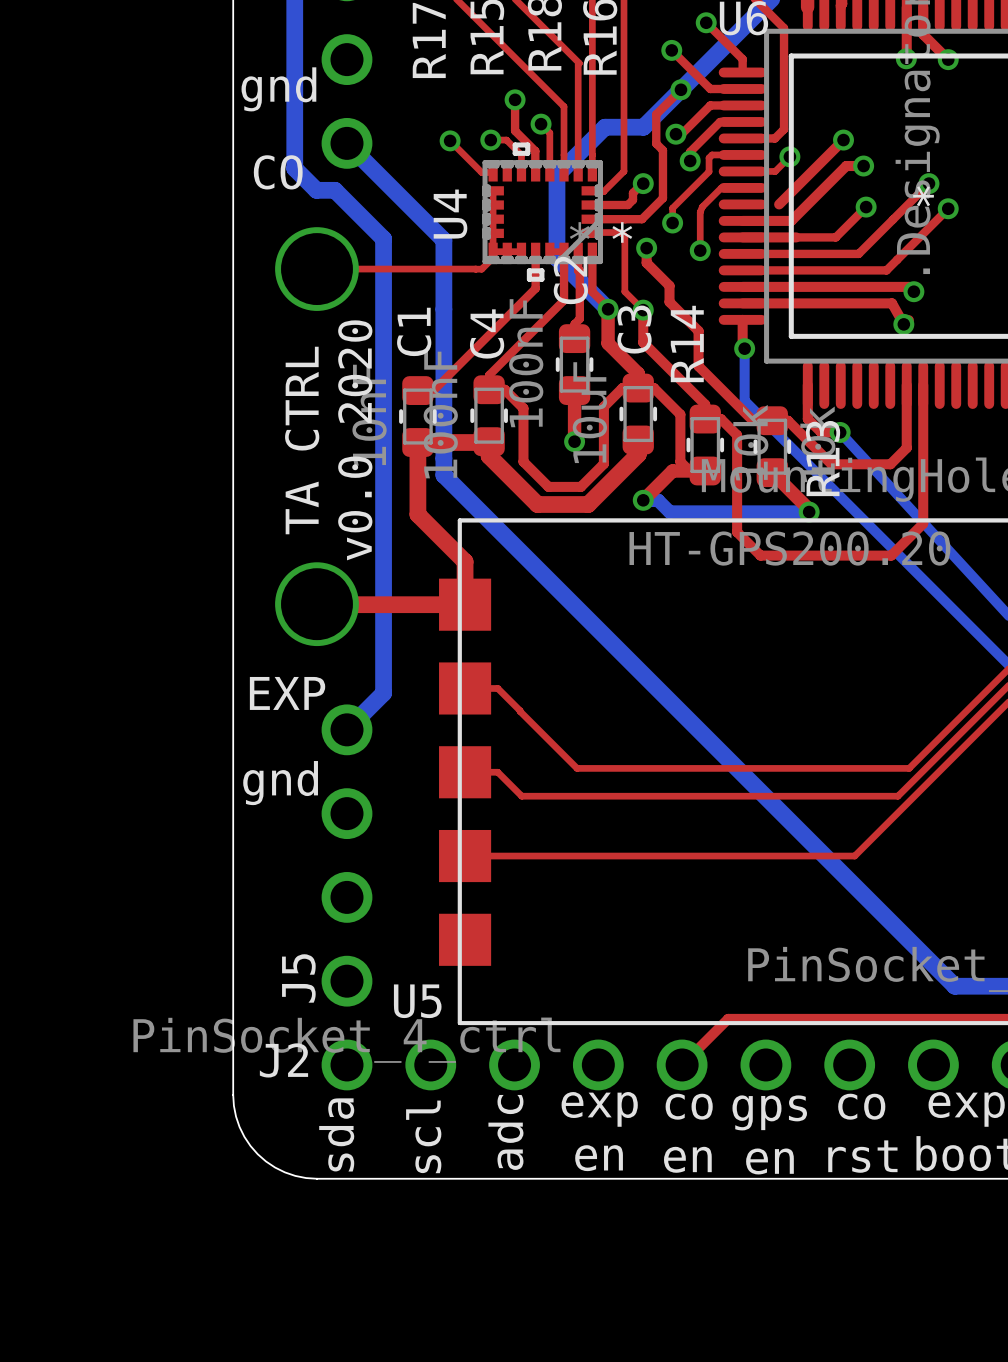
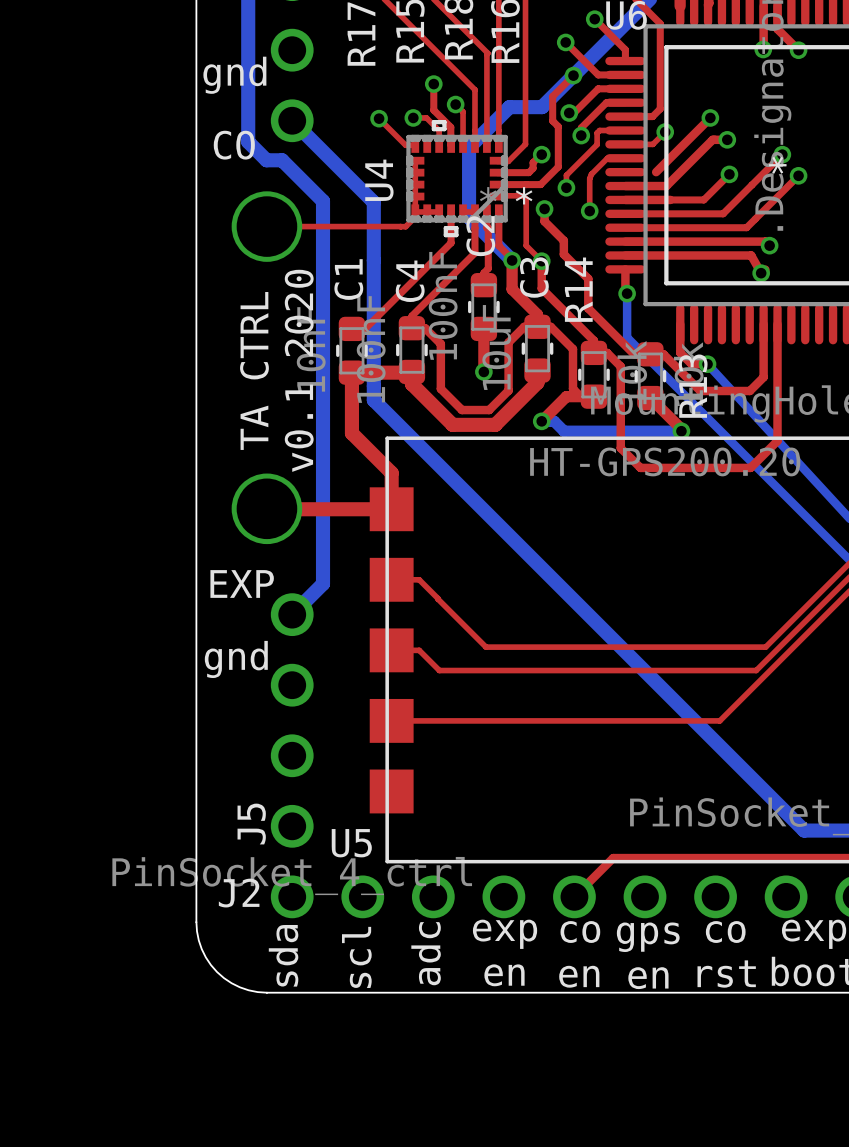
text: v0.0 2020 (355, 440) -> v0.1 2020 (299, 370)

